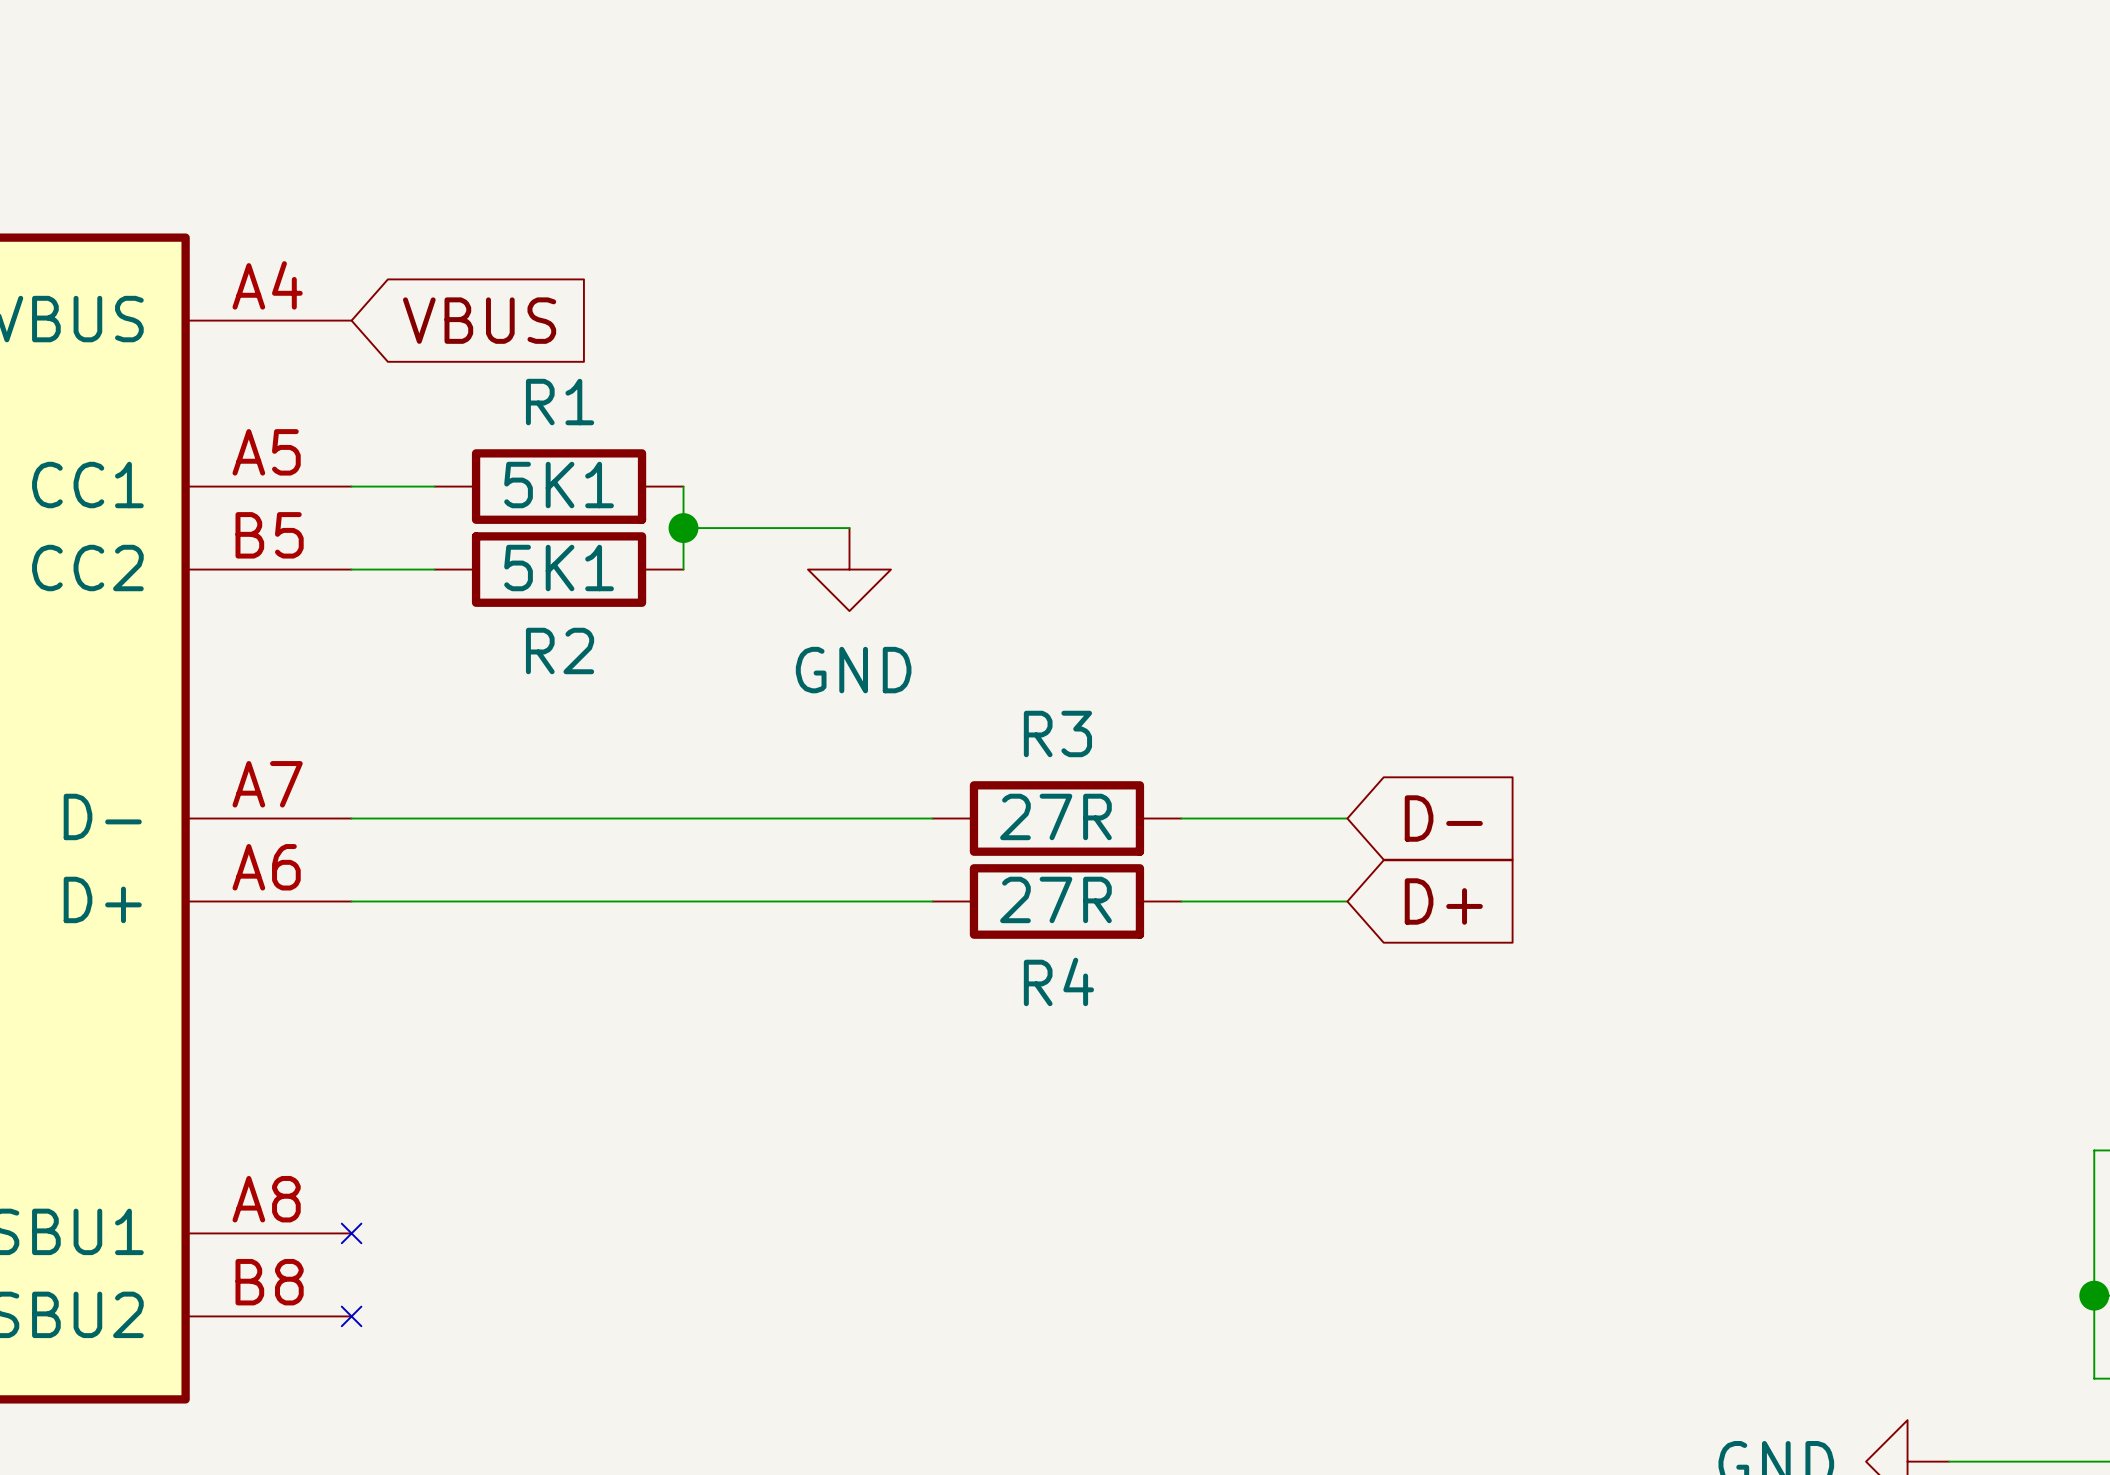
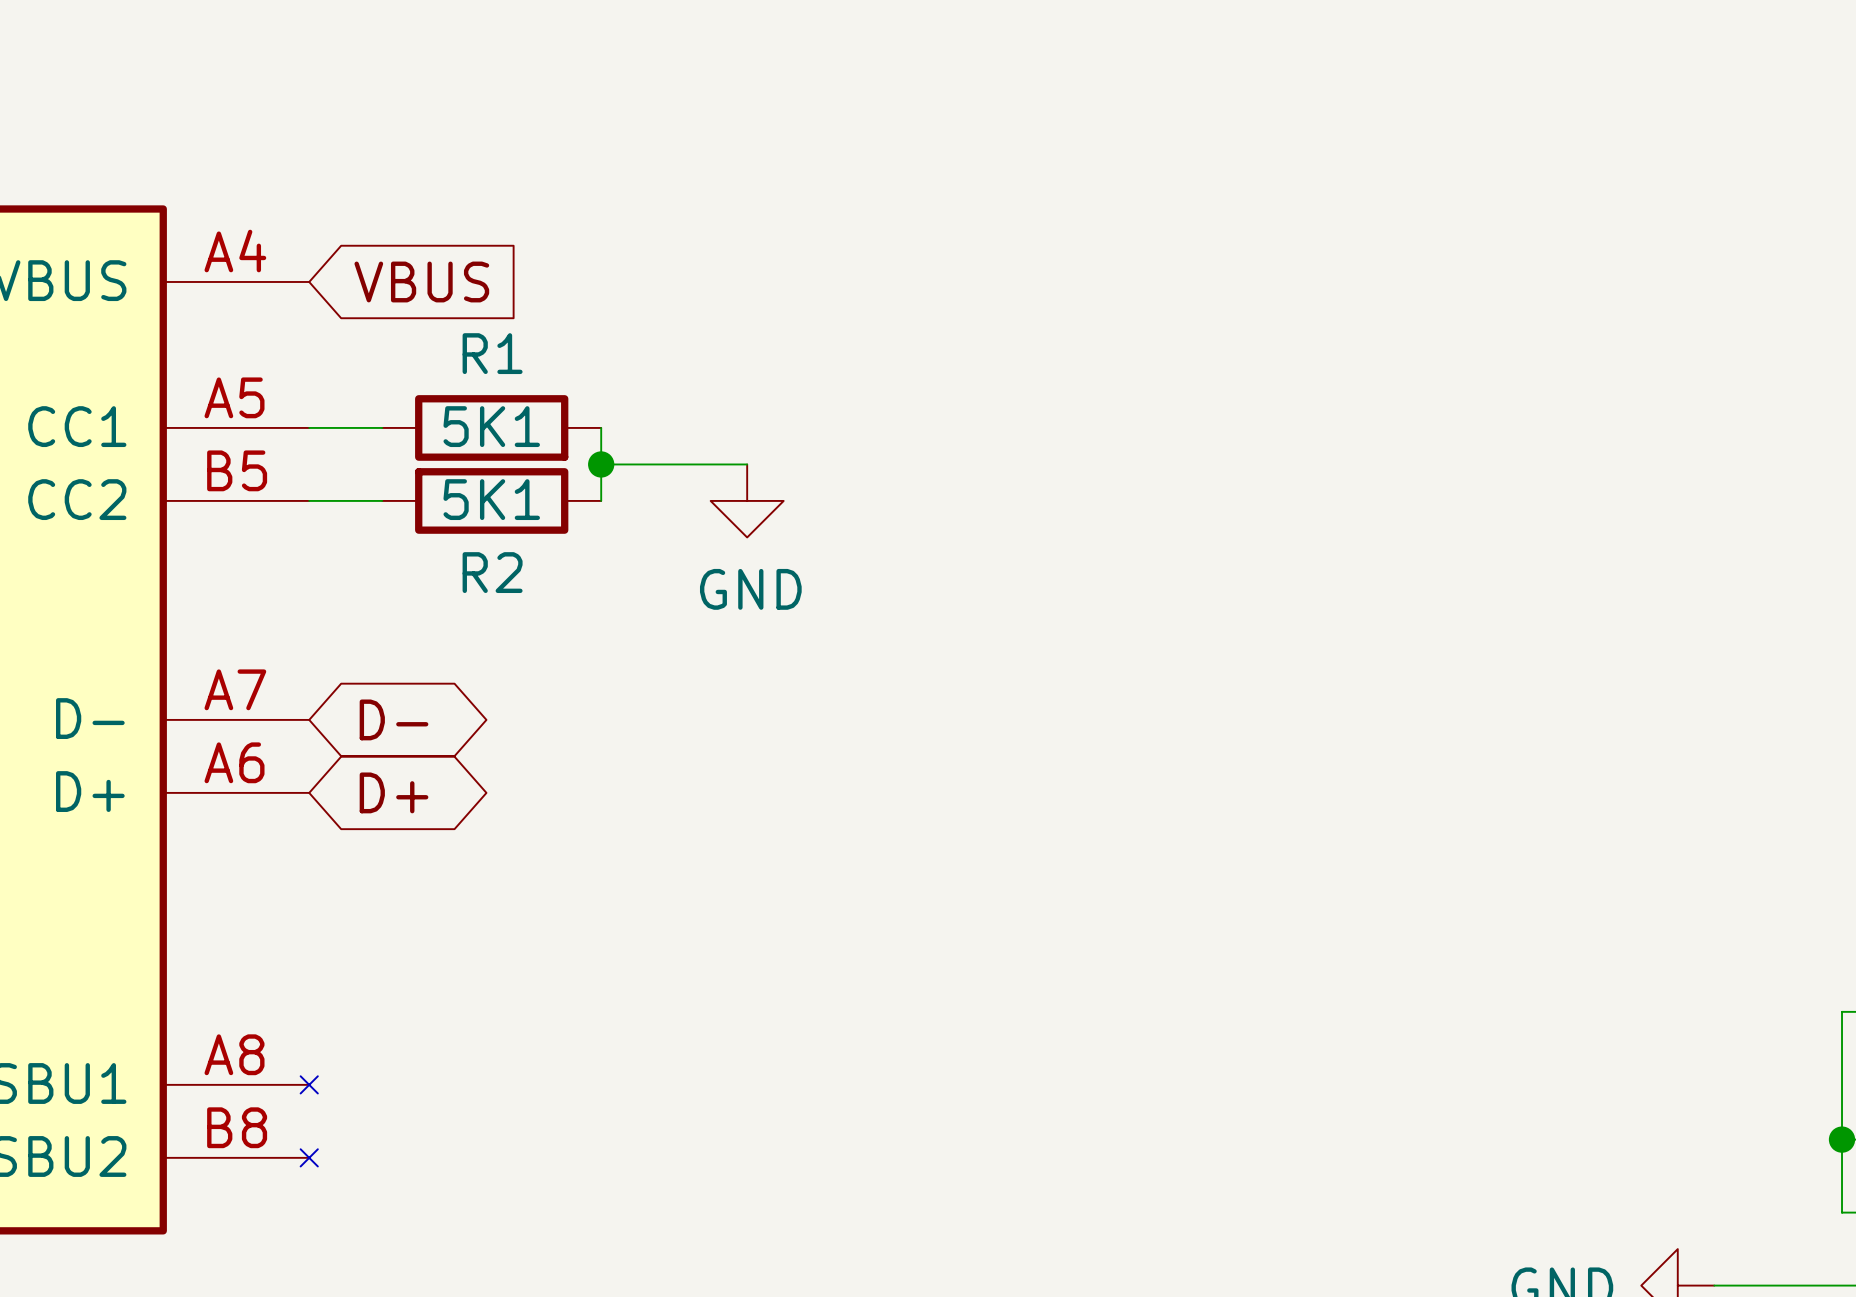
wire: (351, 818) (932, 818) -> none
global label: none -> D- (394, 719)
R3: 27R (1056, 818) -> none
wire: (1181, 818) (1347, 818) -> none
global label: D- (1443, 818) -> none
wire: (351, 901) (932, 901) -> none
global label: none -> D+ (394, 792)
R4: 27R (1056, 901) -> none
wire: (1181, 901) (1347, 901) -> none
global label: D+ (1443, 901) -> none

